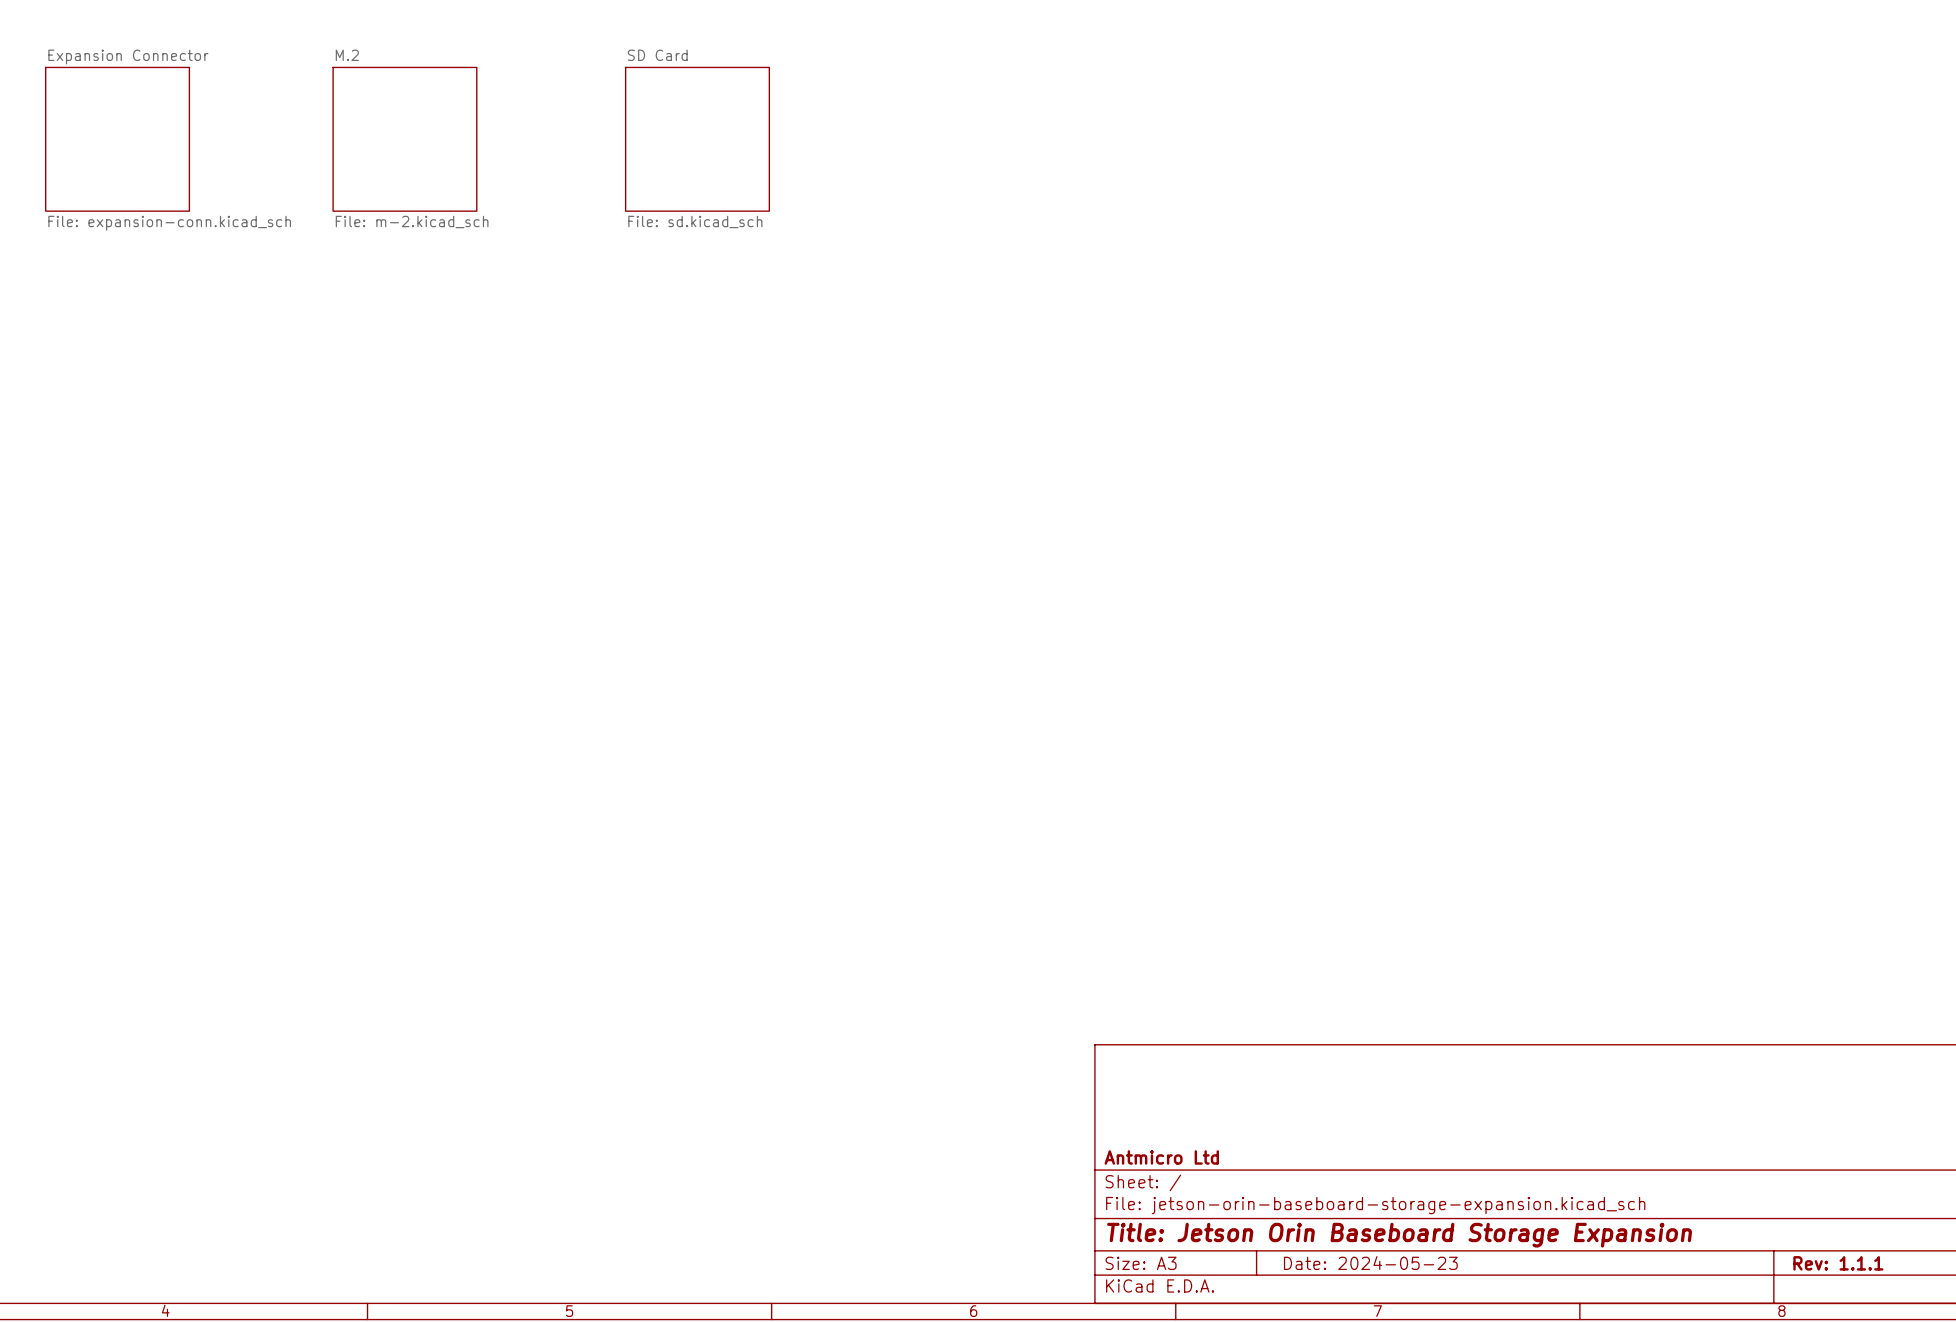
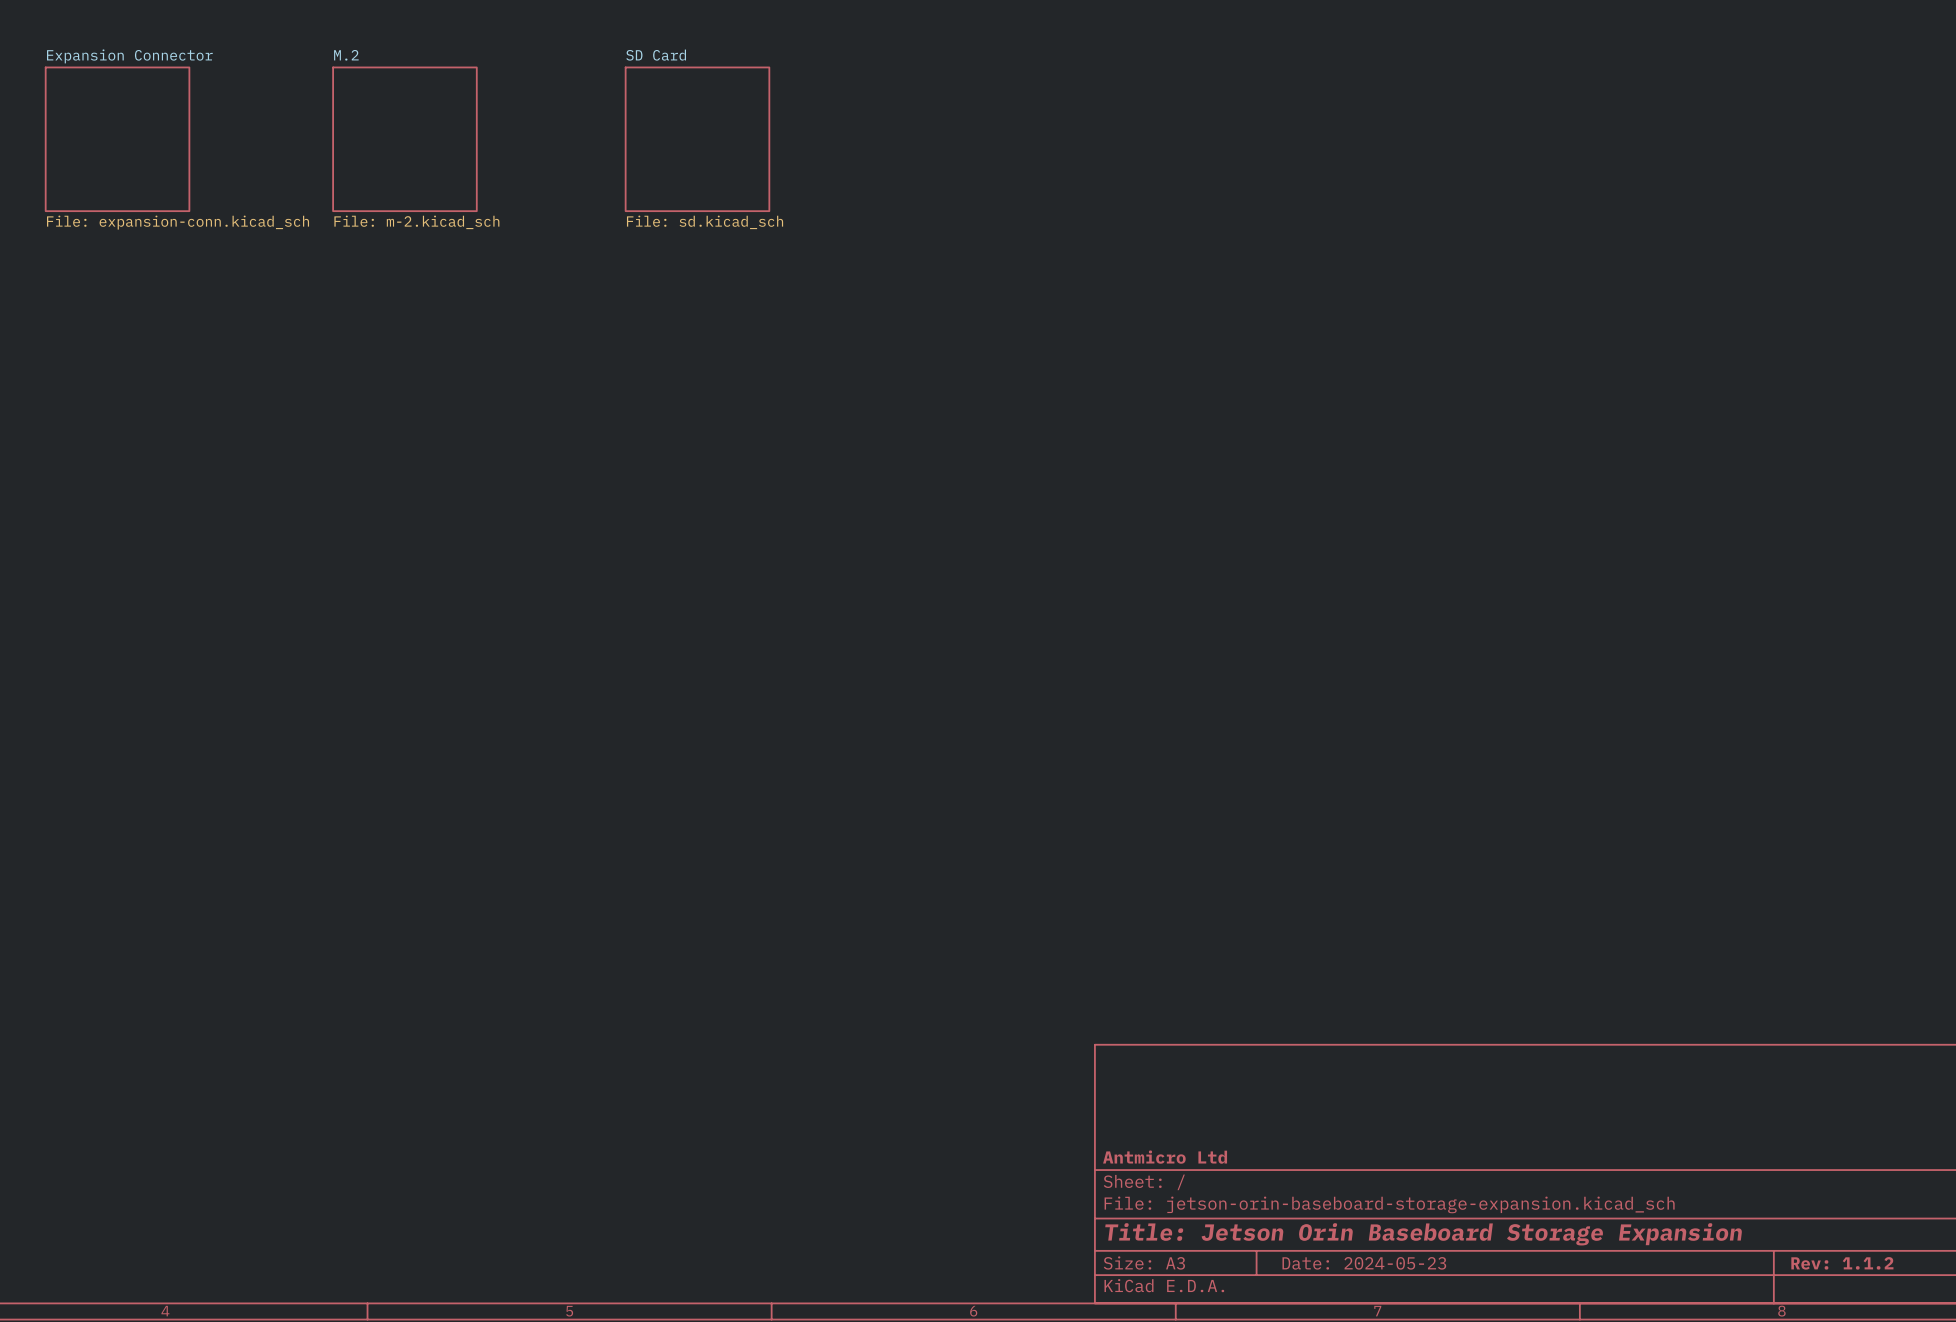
title block: Rev: 1.1.1 (1838, 1263) -> Rev: 1.1.2 (1842, 1263)

